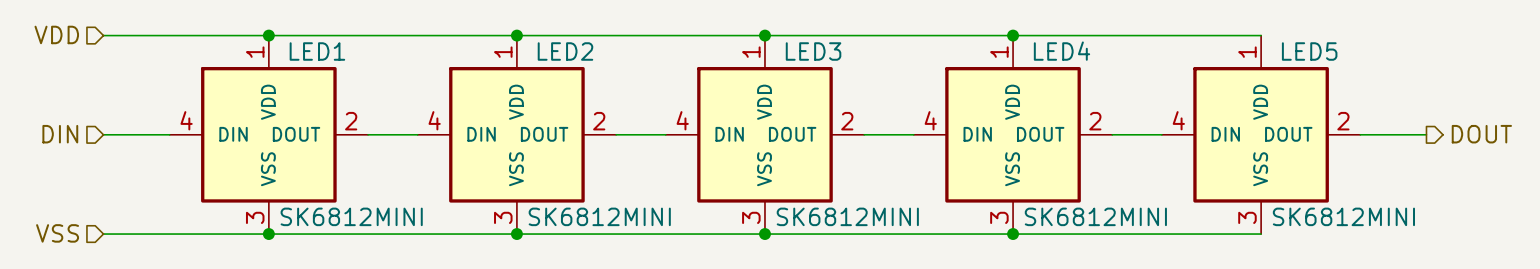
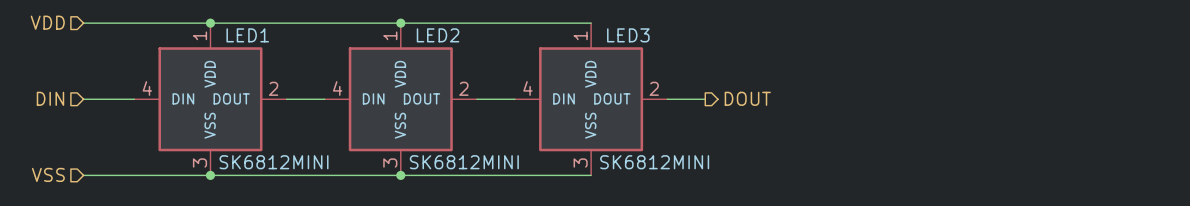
wire: (764, 35) (1261, 35) -> none
junction: (764, 35) -> none
junction: (1013, 35) -> none
hierarchical label: none -> DOUT (747, 98)
LED4: SK6812MINI (1013, 134) -> none
wire: (1112, 134) (1161, 134) -> none
LED5: SK6812MINI (1261, 134) -> none
wire: (1360, 134) (1426, 134) -> none
hierarchical label: DOUT (1481, 134) -> none
wire: (764, 234) (1261, 234) -> none
junction: (764, 234) -> none
junction: (1013, 234) -> none

